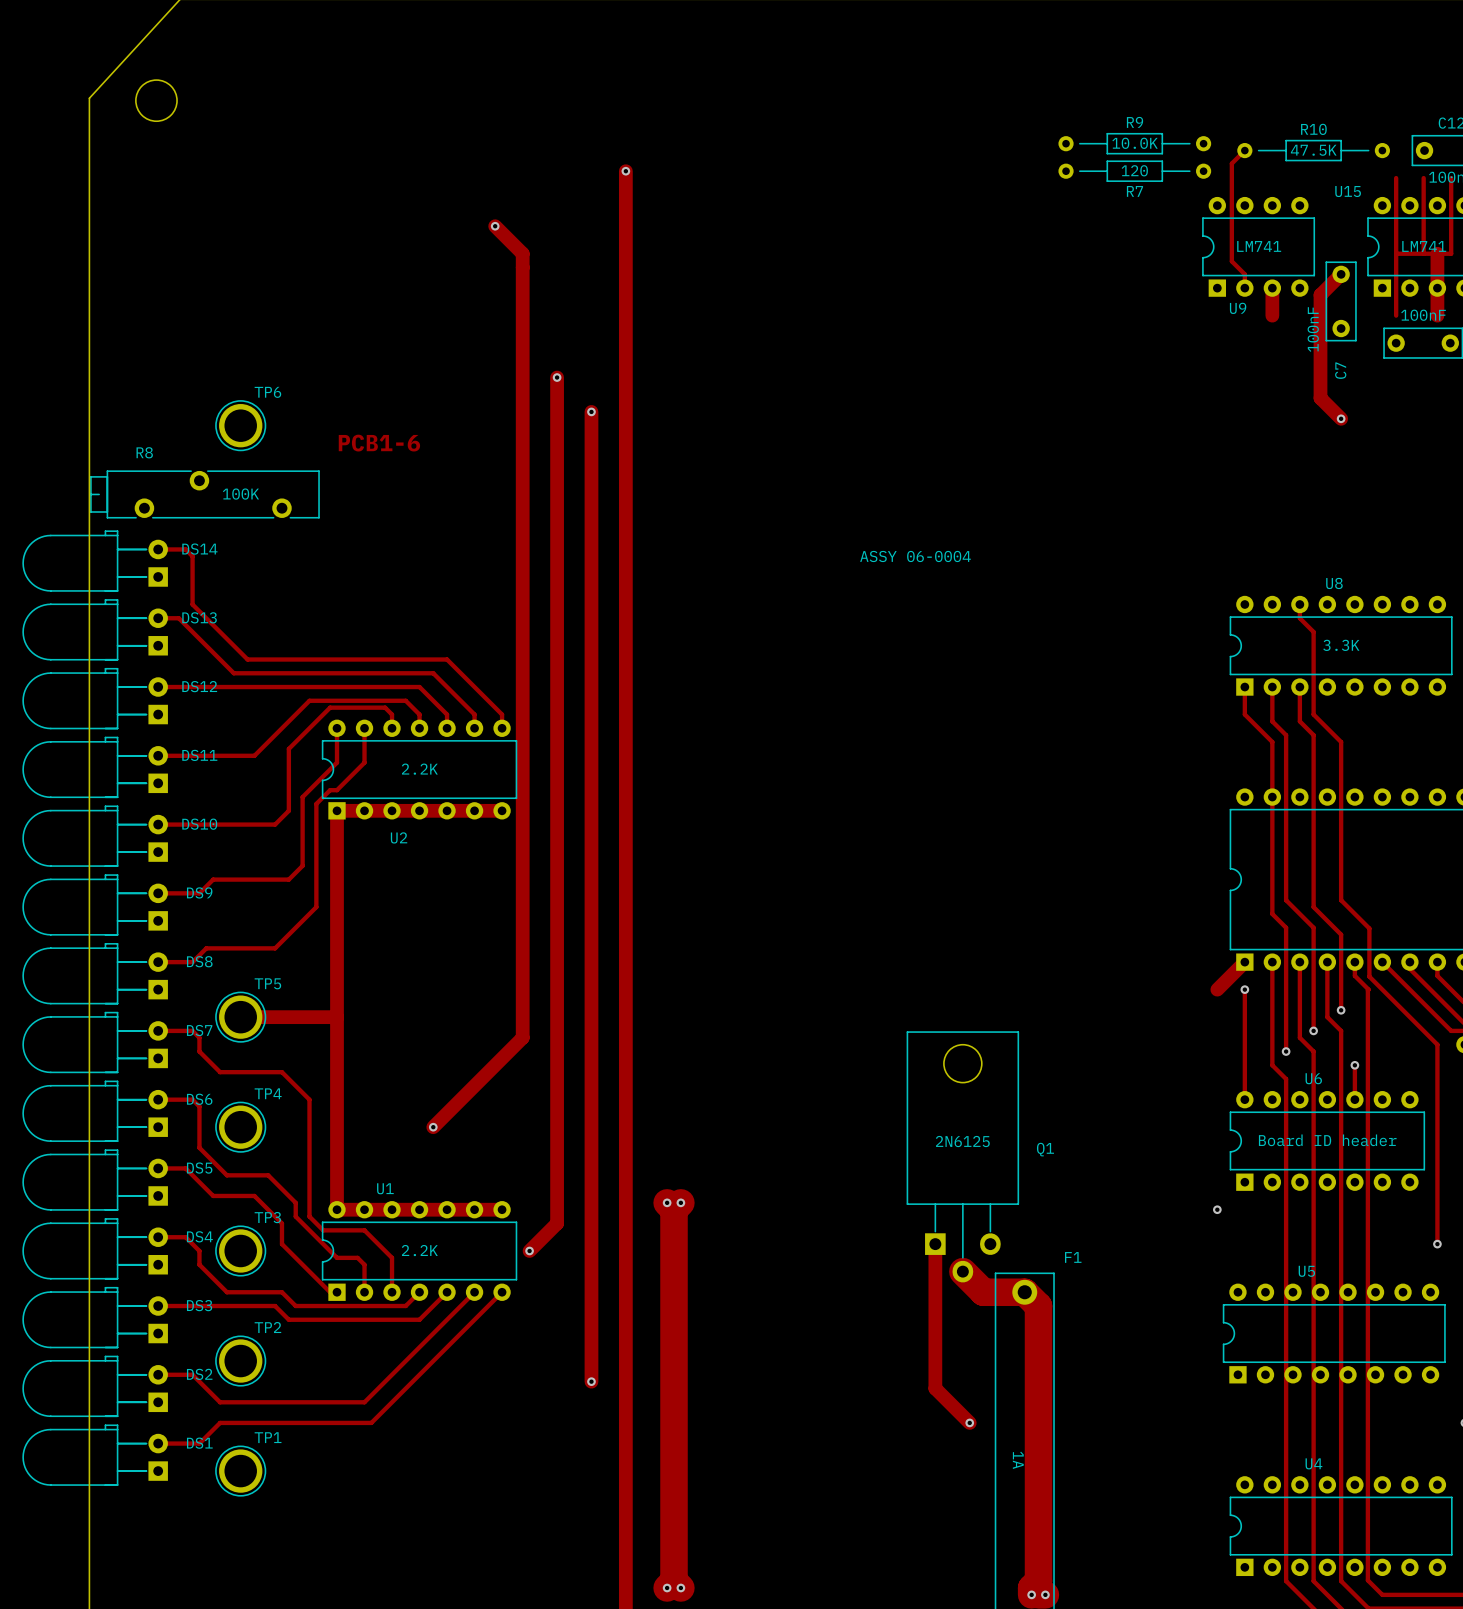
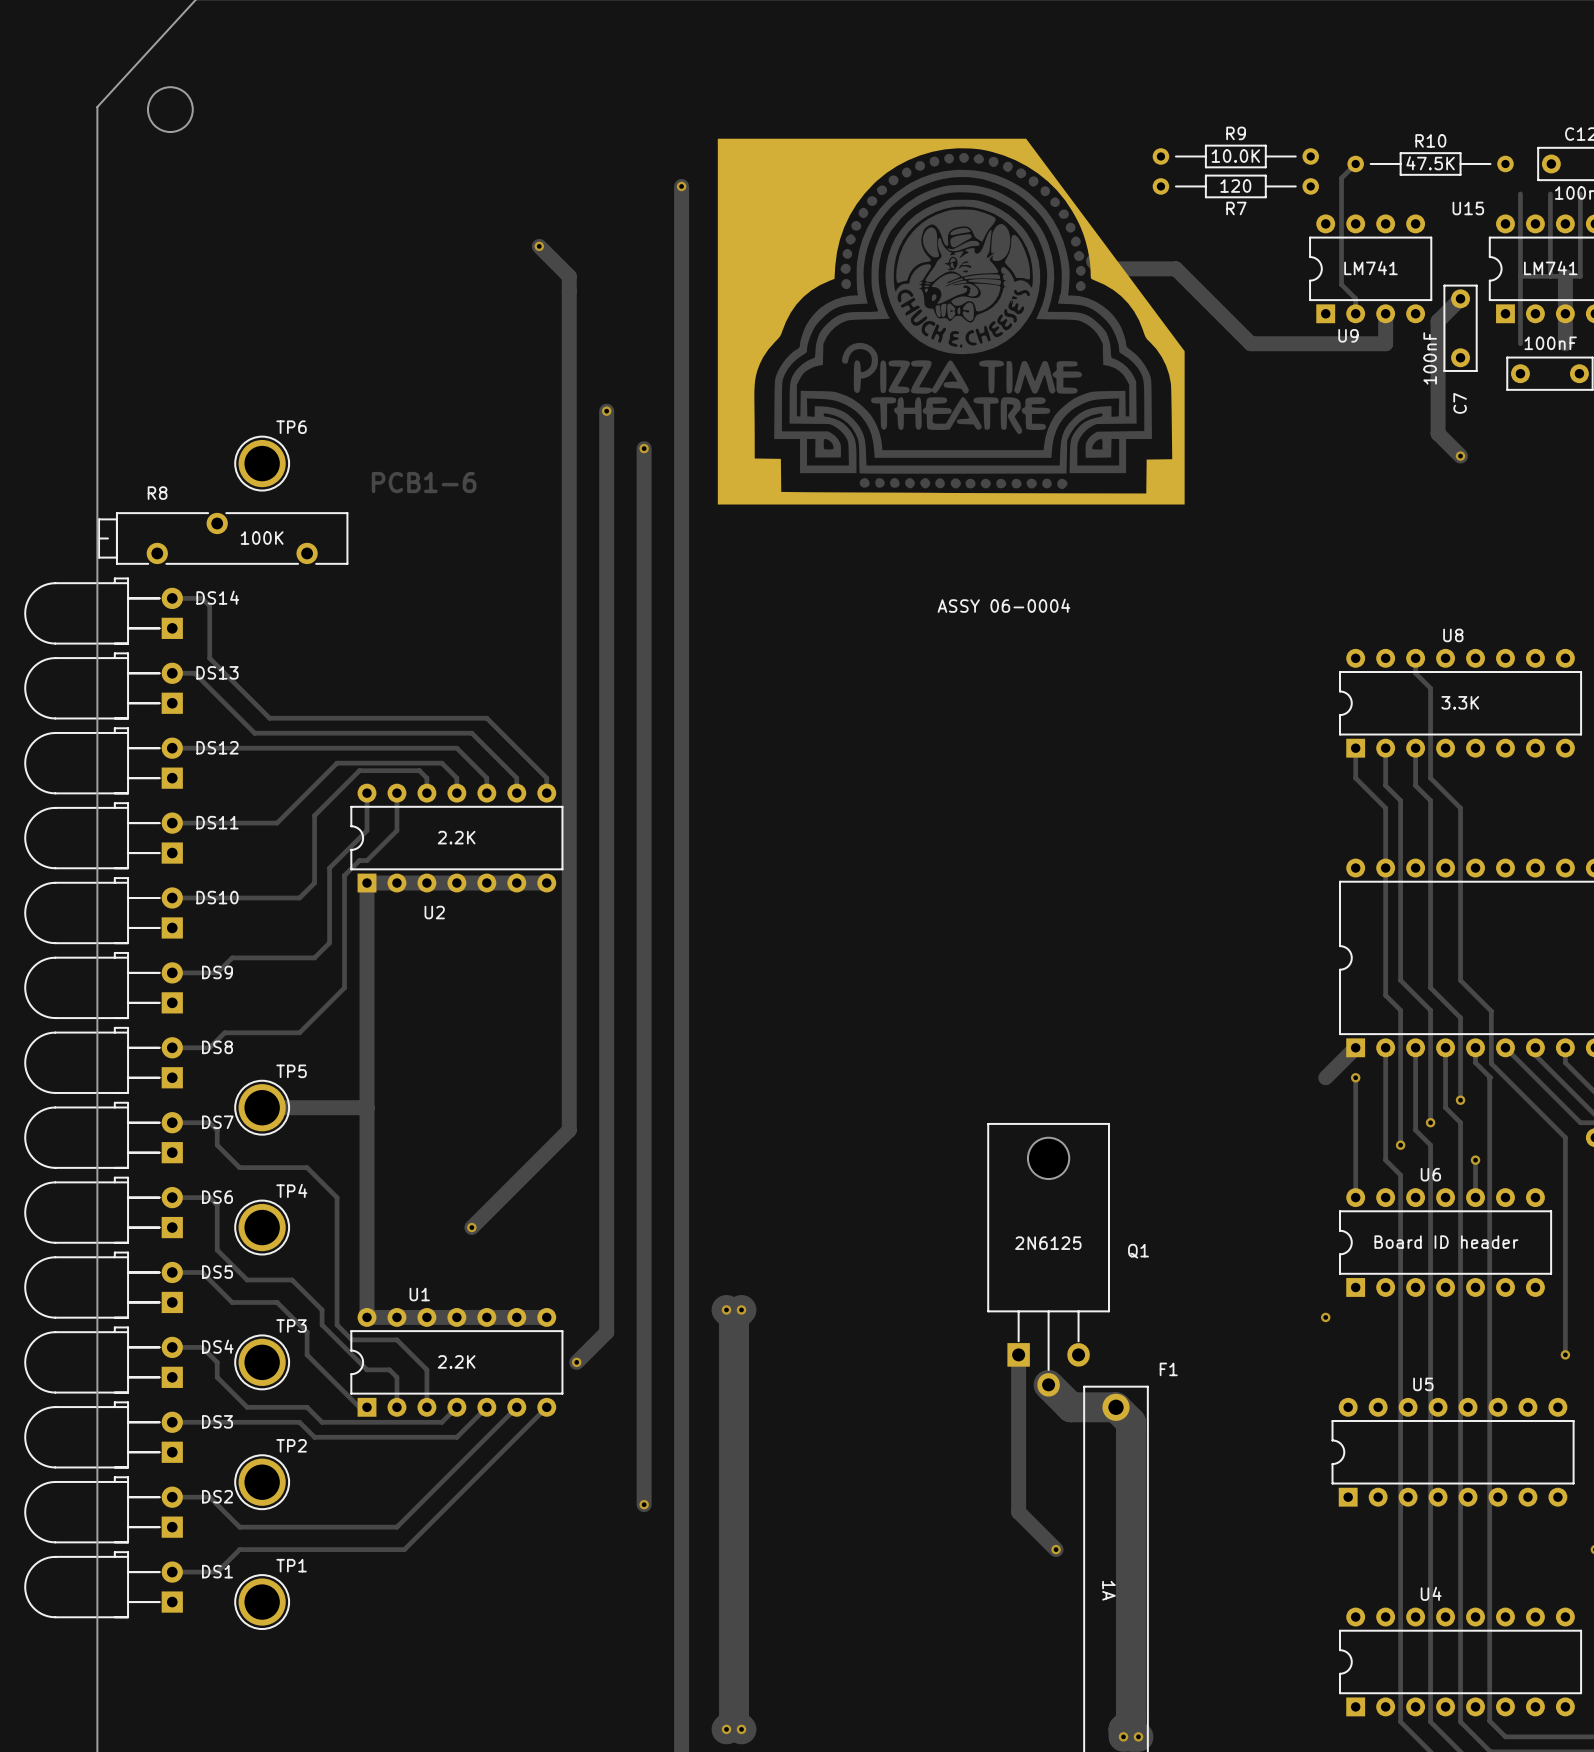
track: none -> (1093, 261) (1101, 268) (1175, 268) (1250, 343) (1385, 343)
part: none -> (951, 321)

